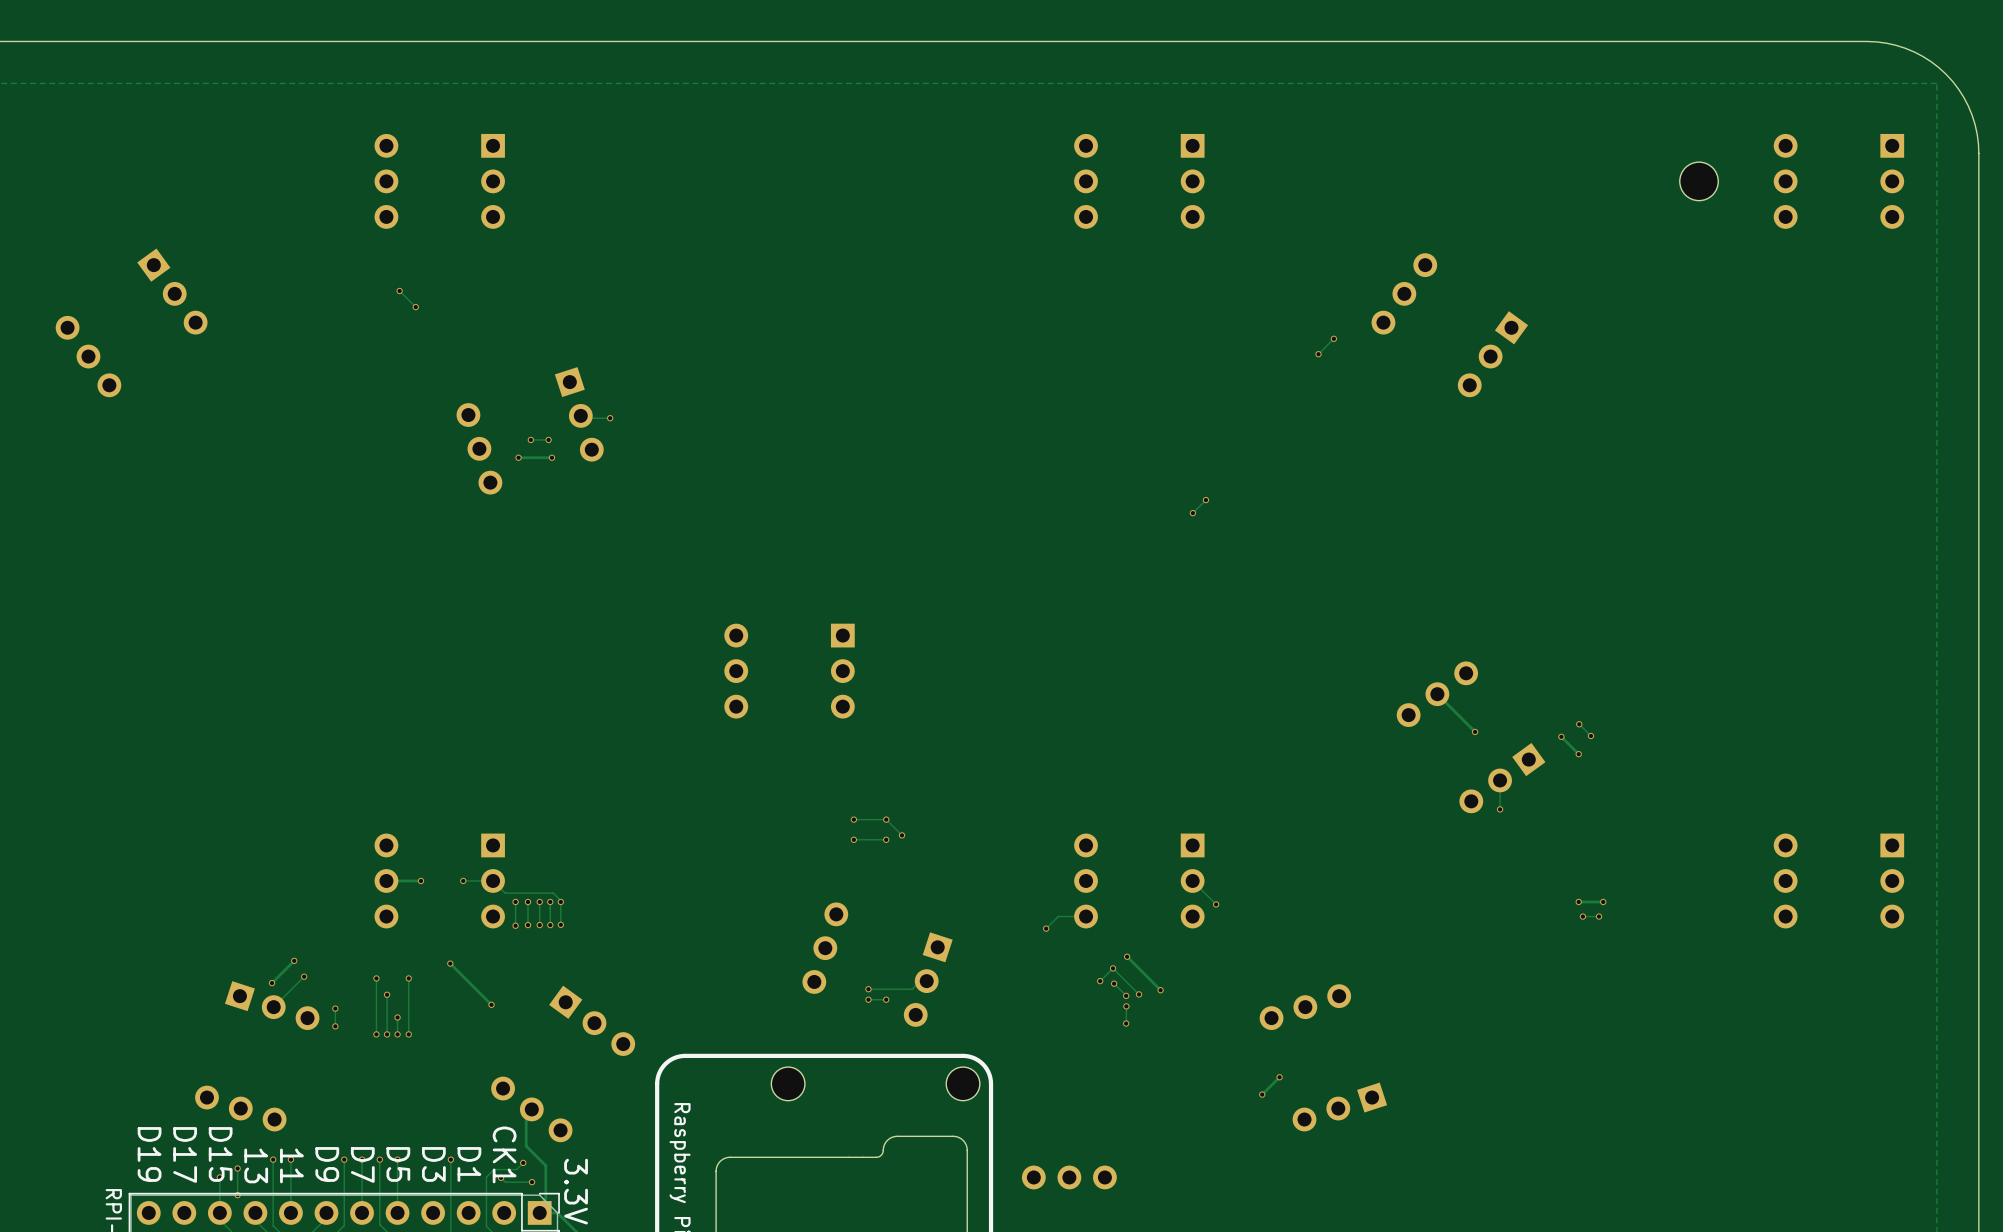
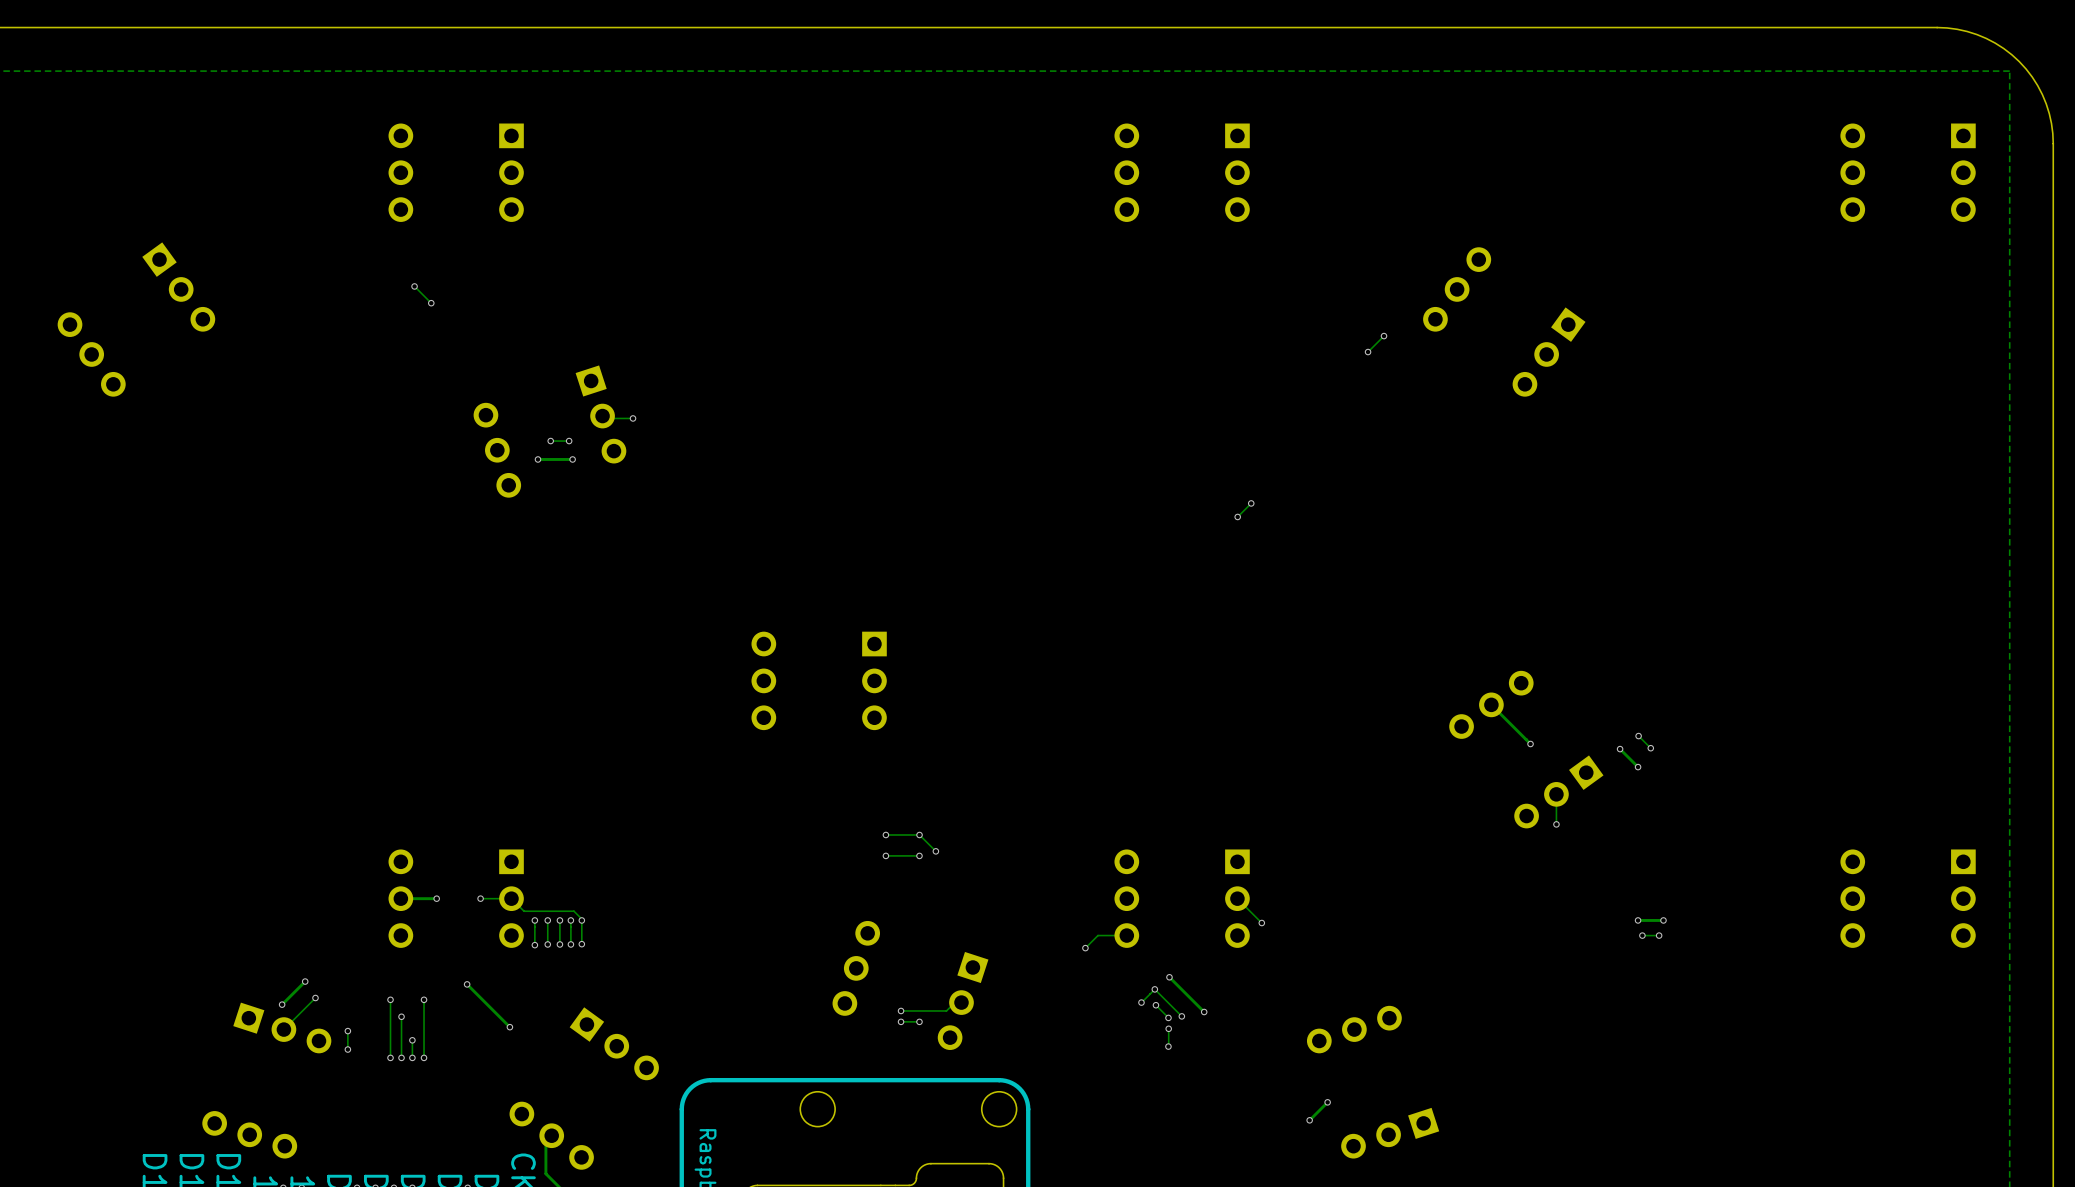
part: (1699, 181) -> none

